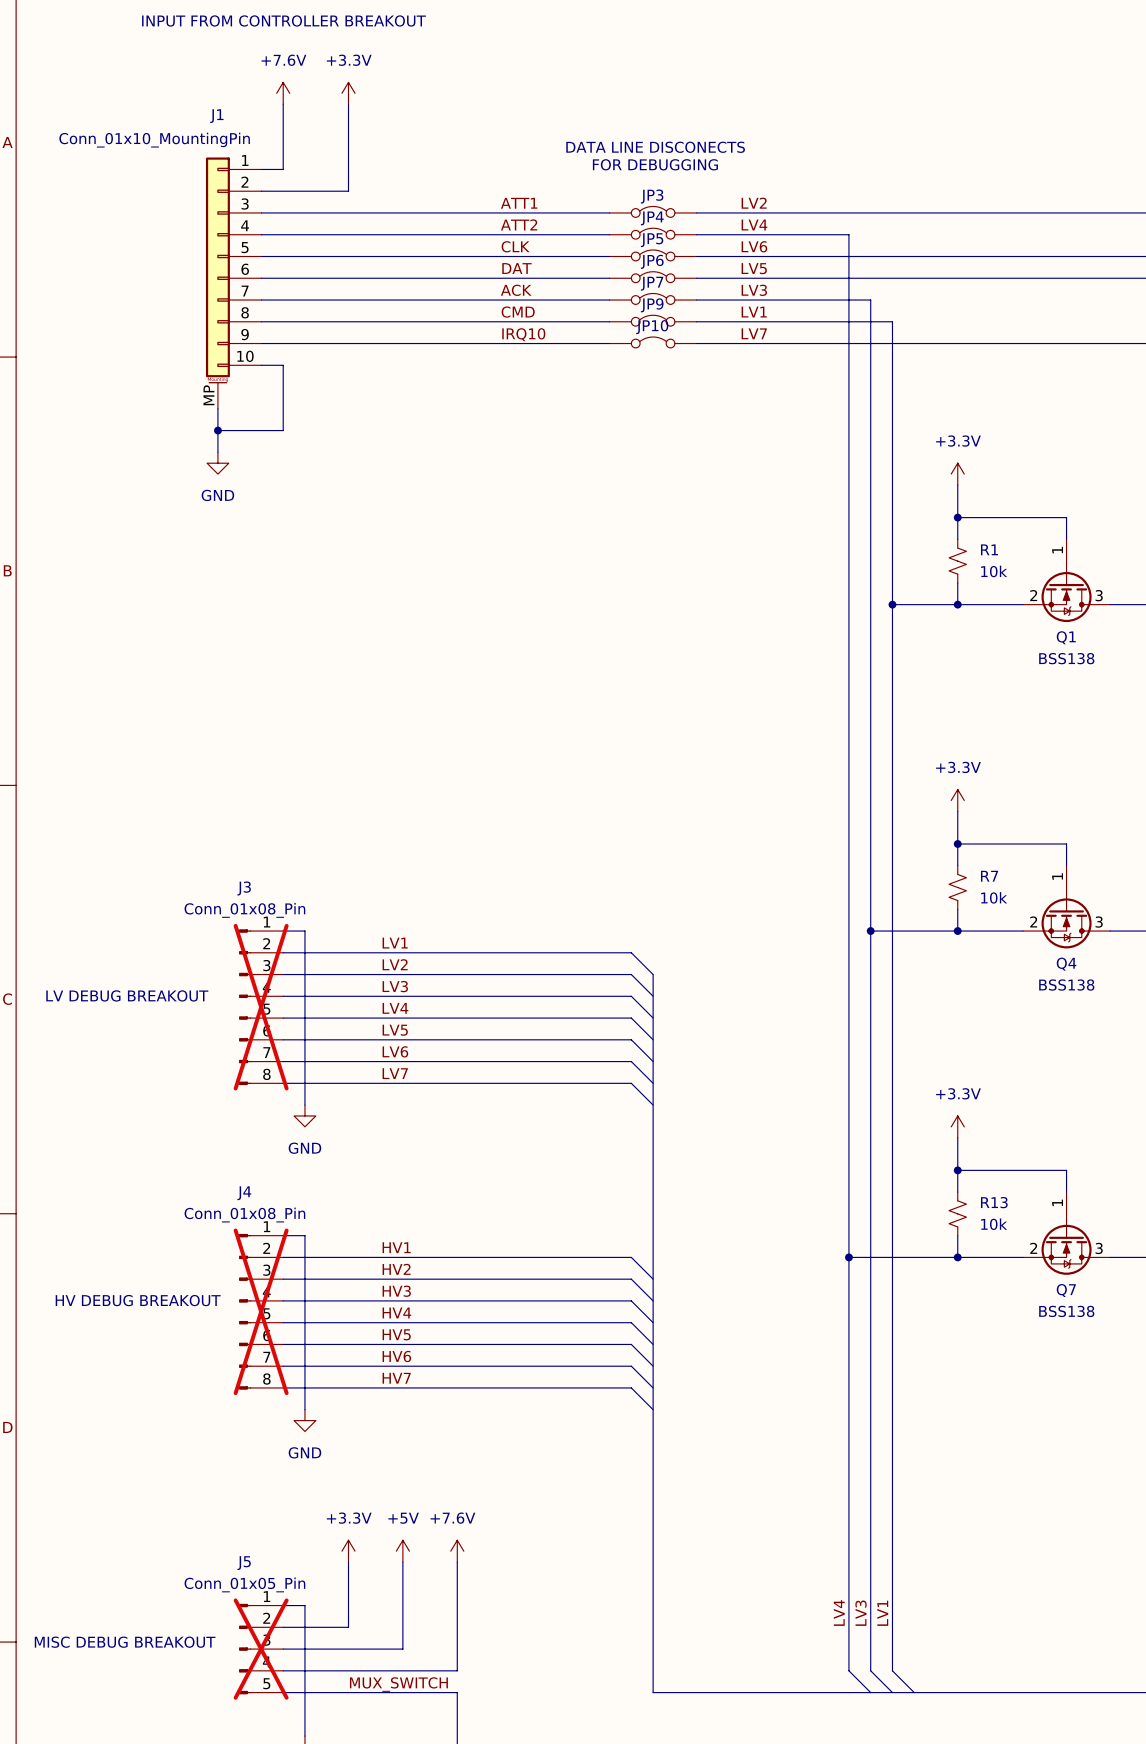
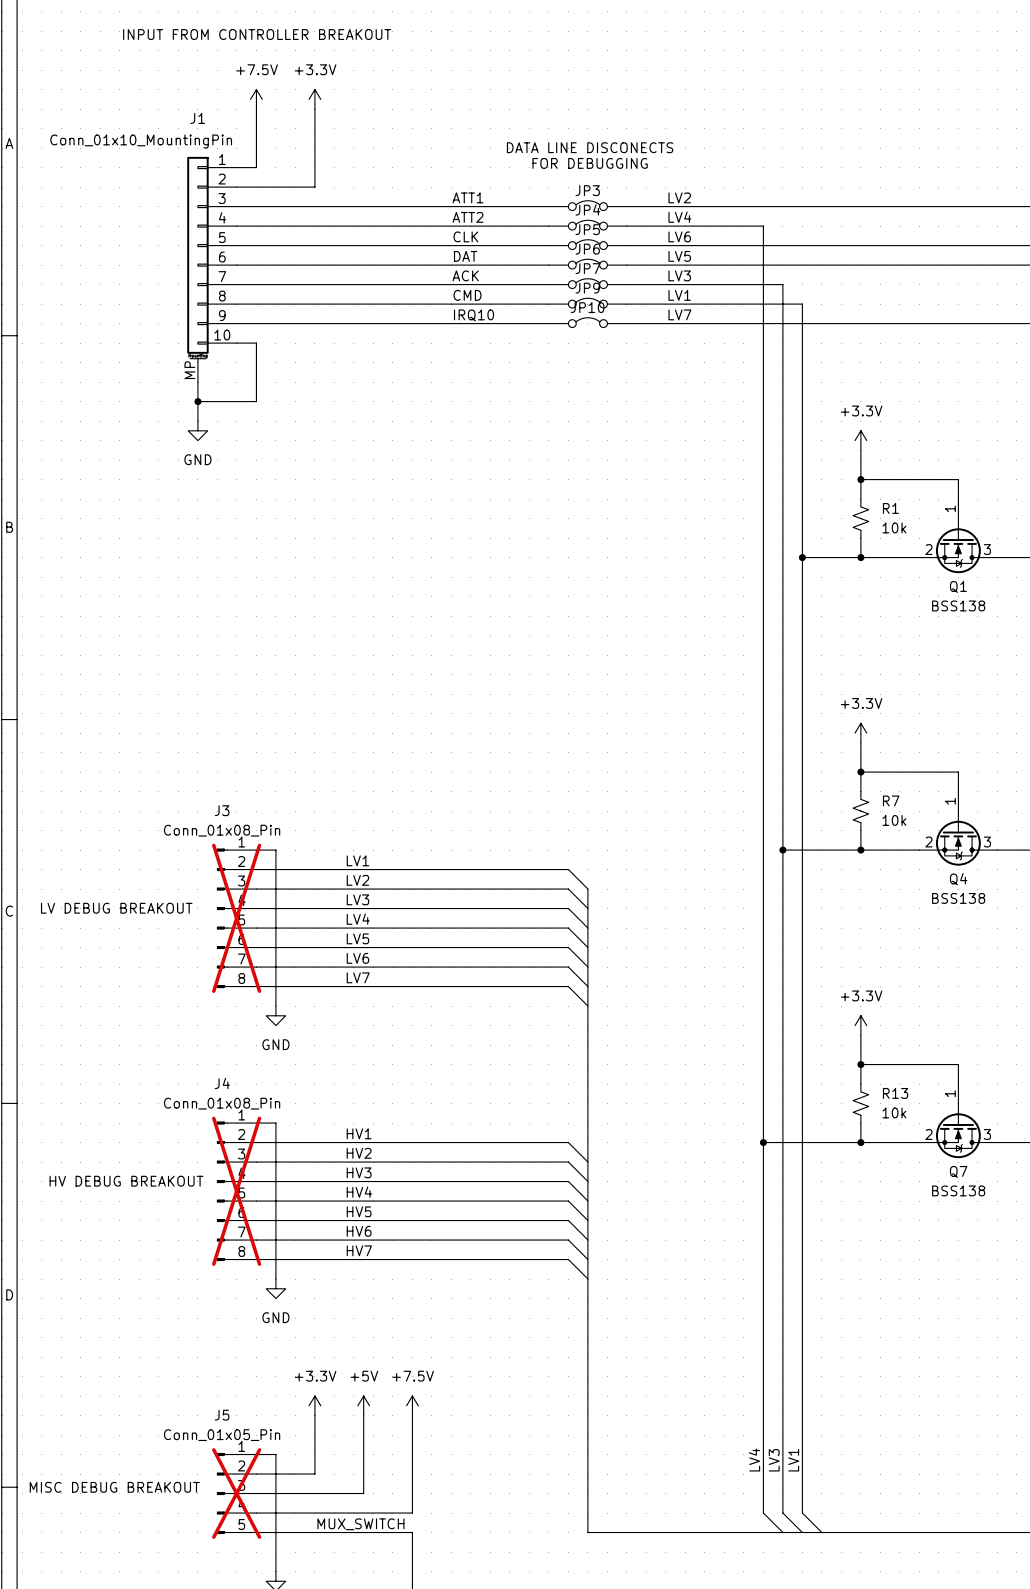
power symbol: +7.6V (283, 93) -> +7.5V (256, 99)
power symbol: +7.6V (457, 1551) -> +7.5V (412, 1405)

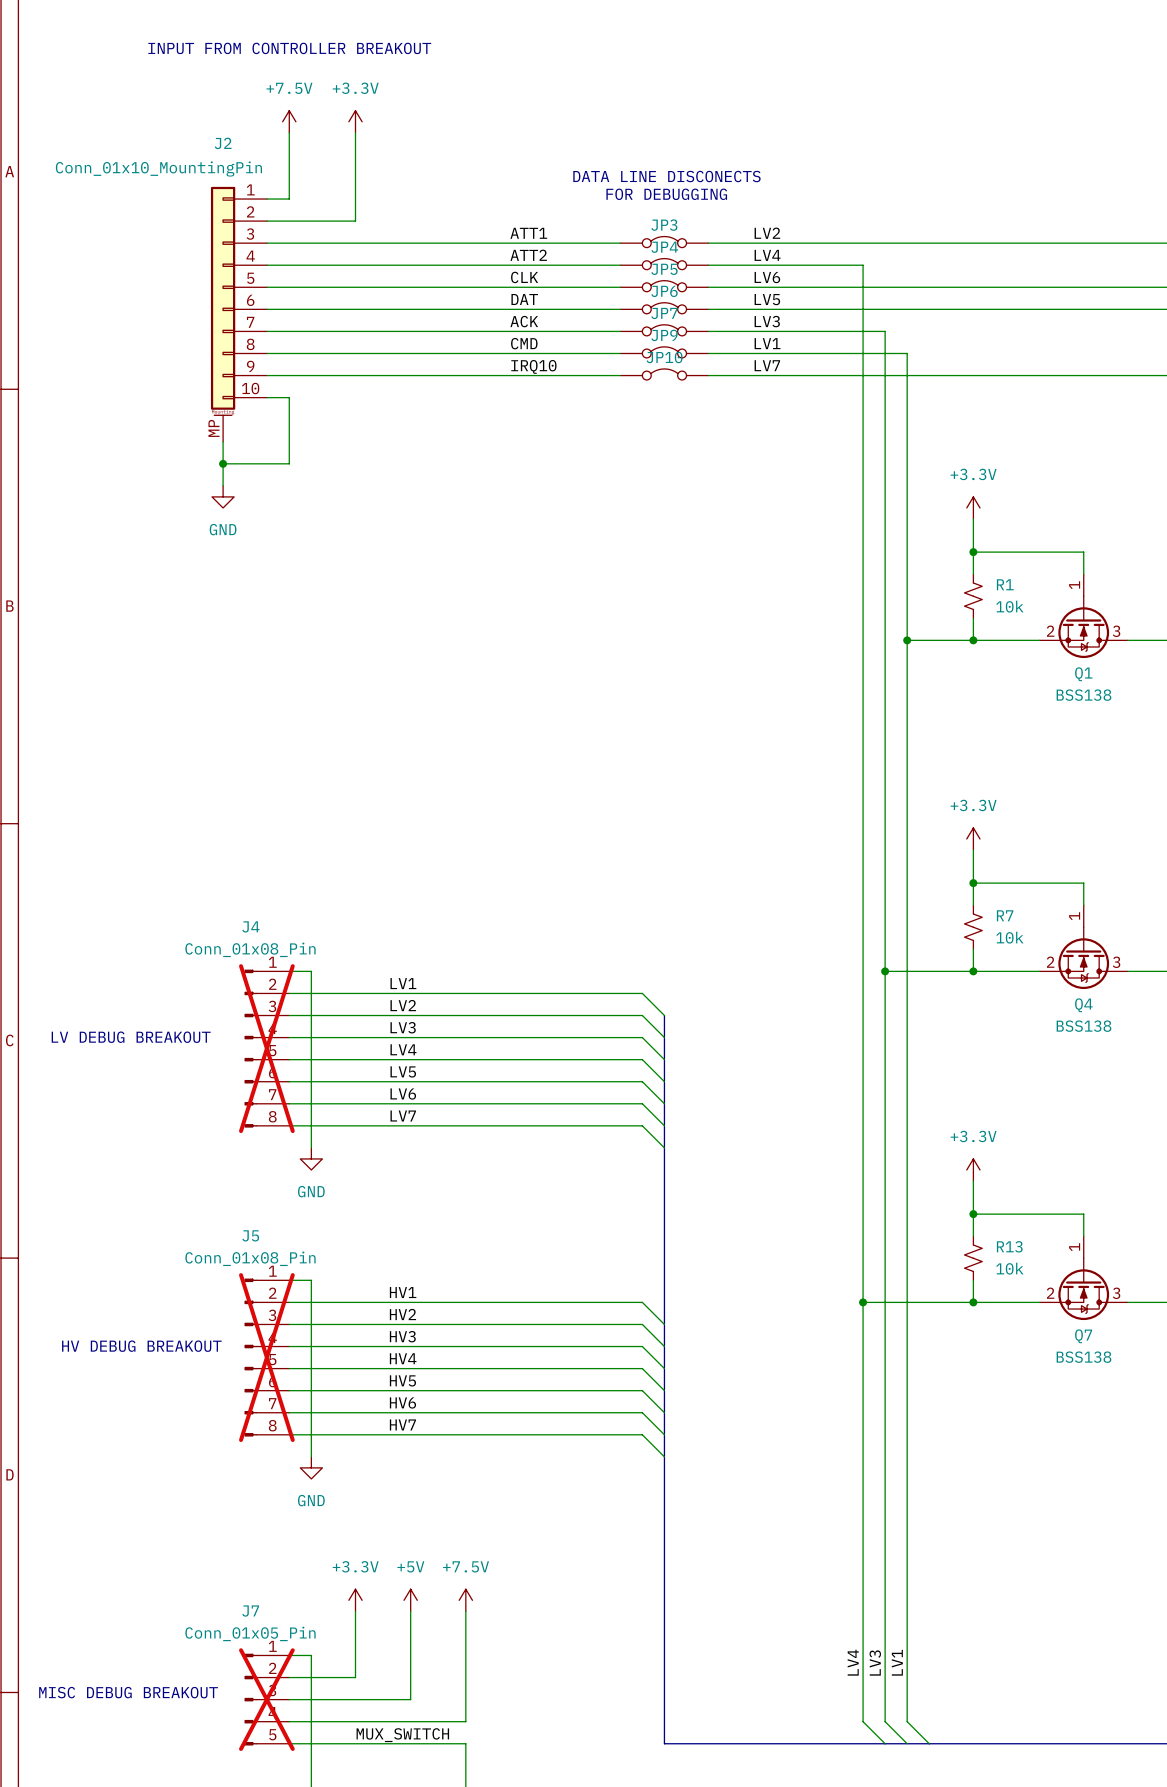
J1 name: J1 (197, 118) -> J2 (223, 143)
J3 name: J3 (222, 810) -> J4 (250, 926)
J4 name: J4 (222, 1083) -> J5 (250, 1235)
J5 name: J5 (222, 1415) -> J7 (250, 1611)

